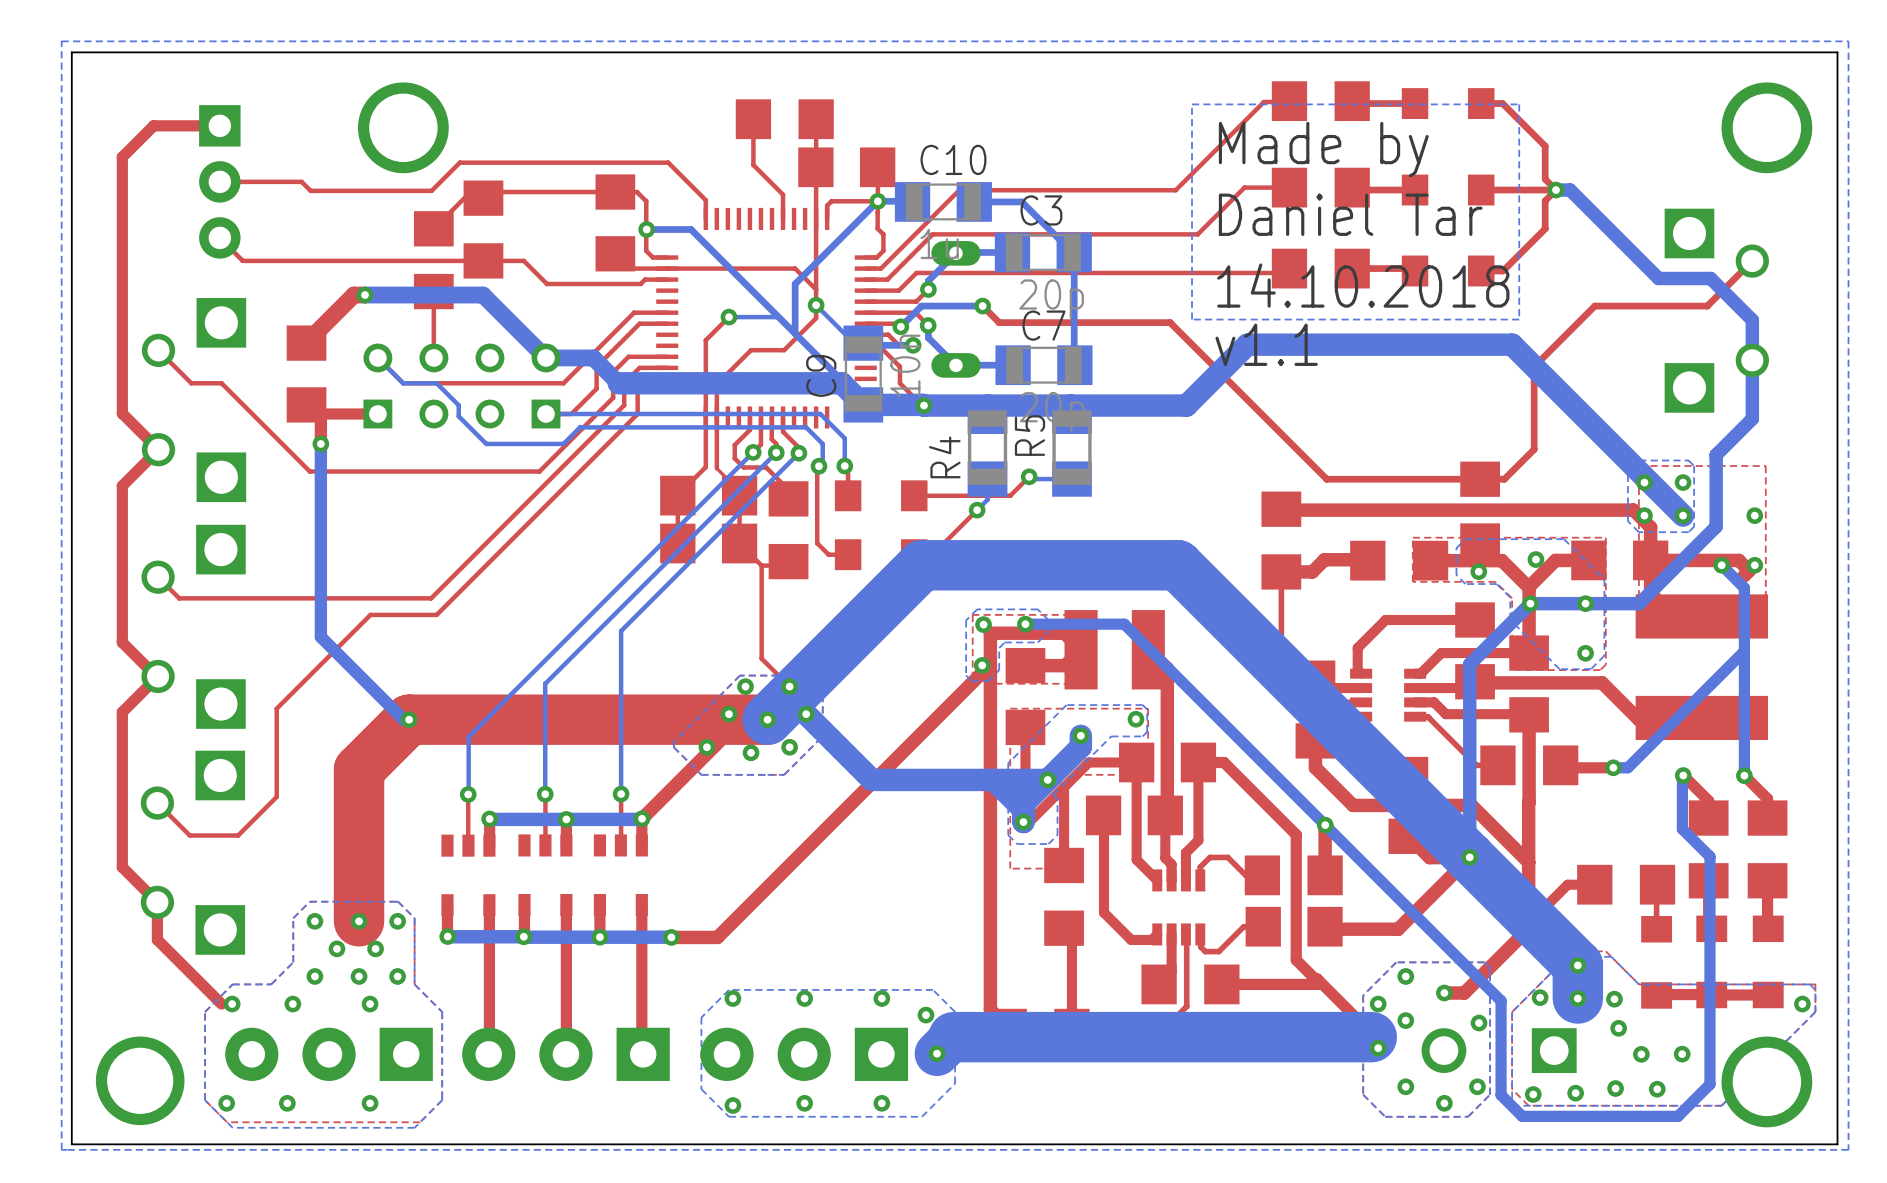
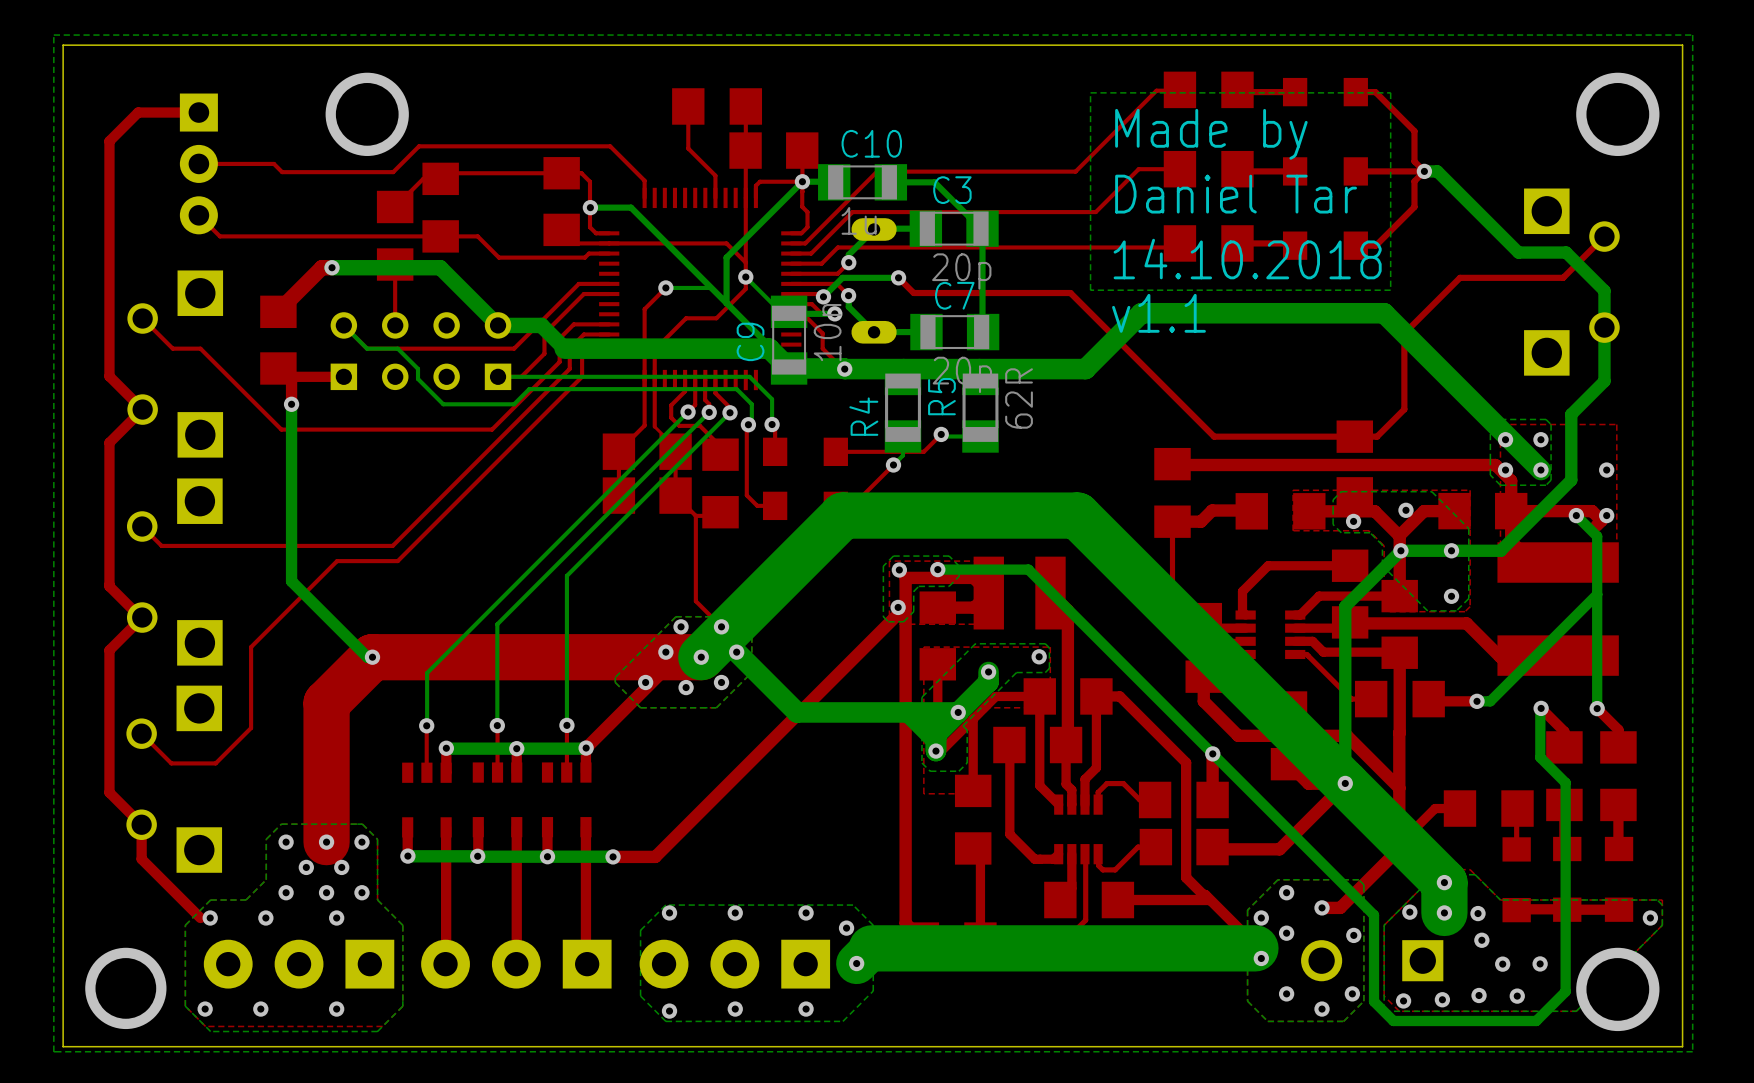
R5 value: none -> 62R (1019, 398)

